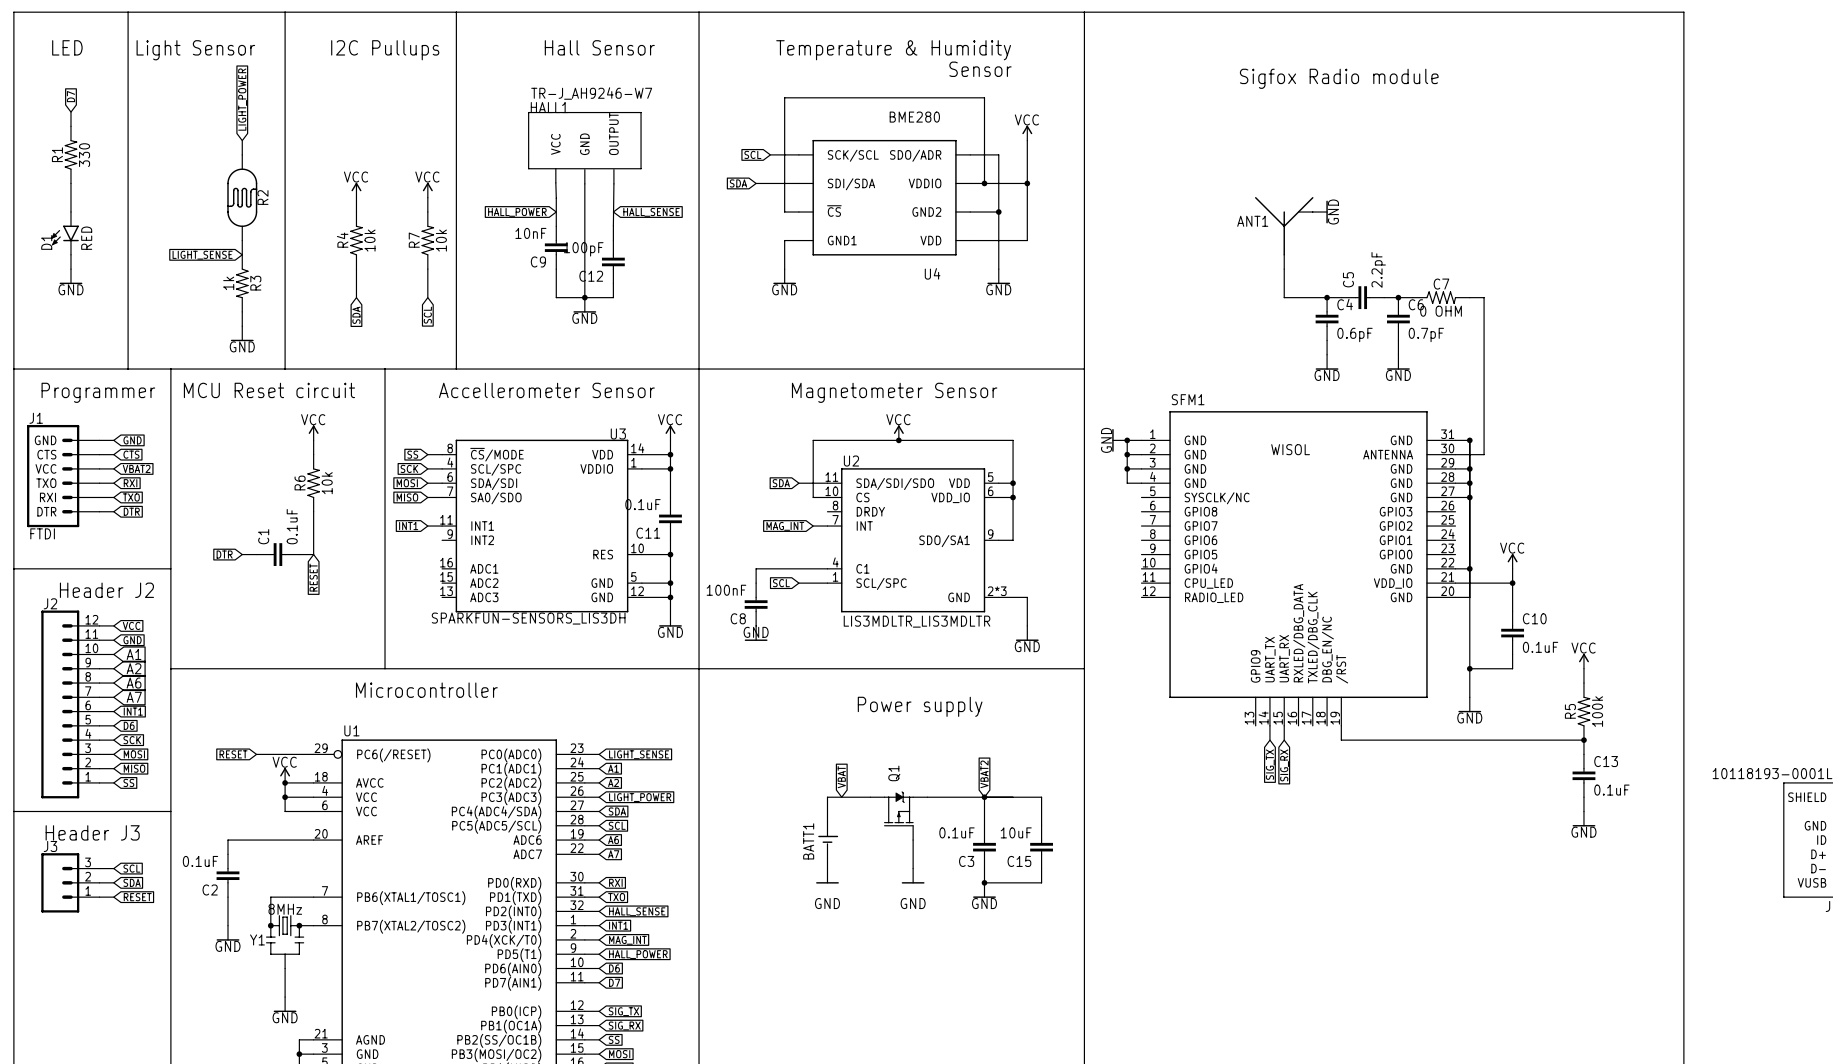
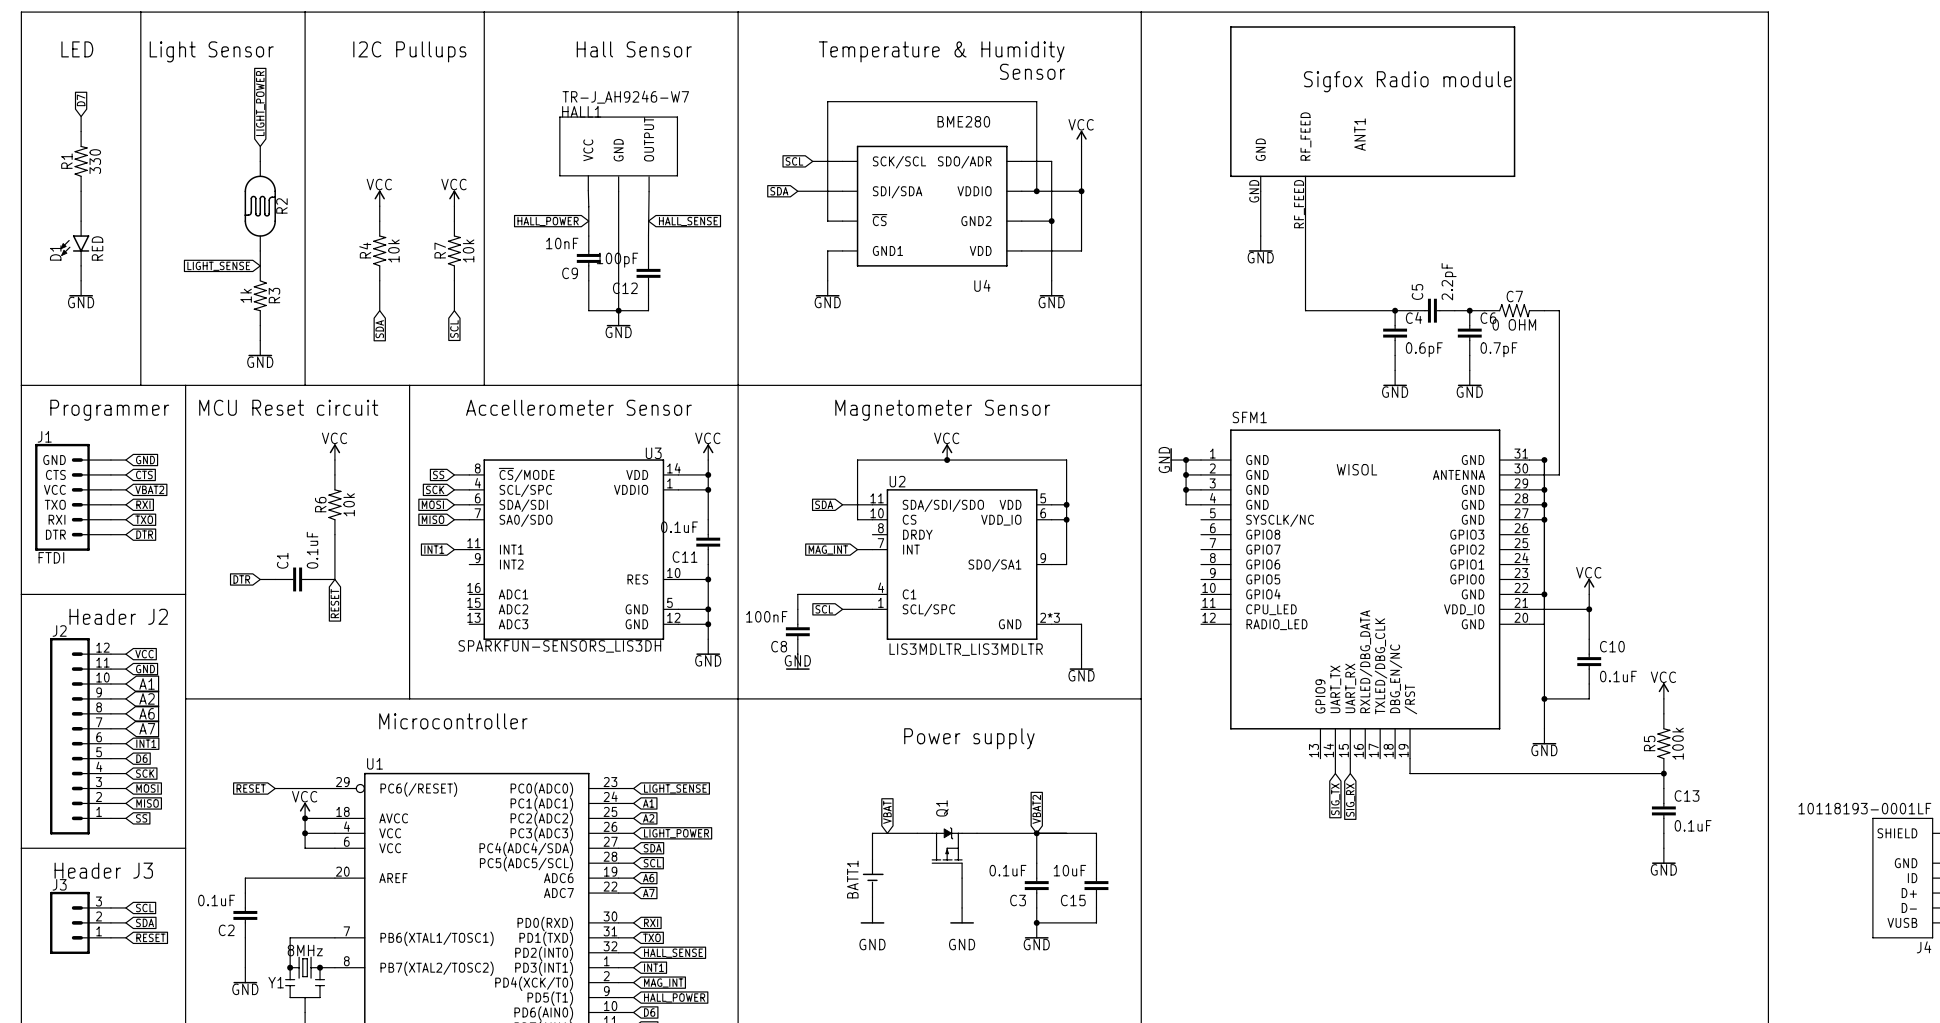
wire: none -> (1260, 191) (1260, 236)
ANT1 symbol: [1254, 197, 1314, 270] -> [1230, 26, 1516, 192]
power symbol position: GND (1320, 212) -> GND (1260, 243)
power symbol rotation: 0° (1327, 212) -> 90° clockwise (1260, 250)
ANT1 name position: ANT1 (1252, 221) -> ANT1 (1360, 134)
wire: (1284, 269) (1284, 297) -> (1305, 191) (1305, 310) (1350, 310)

